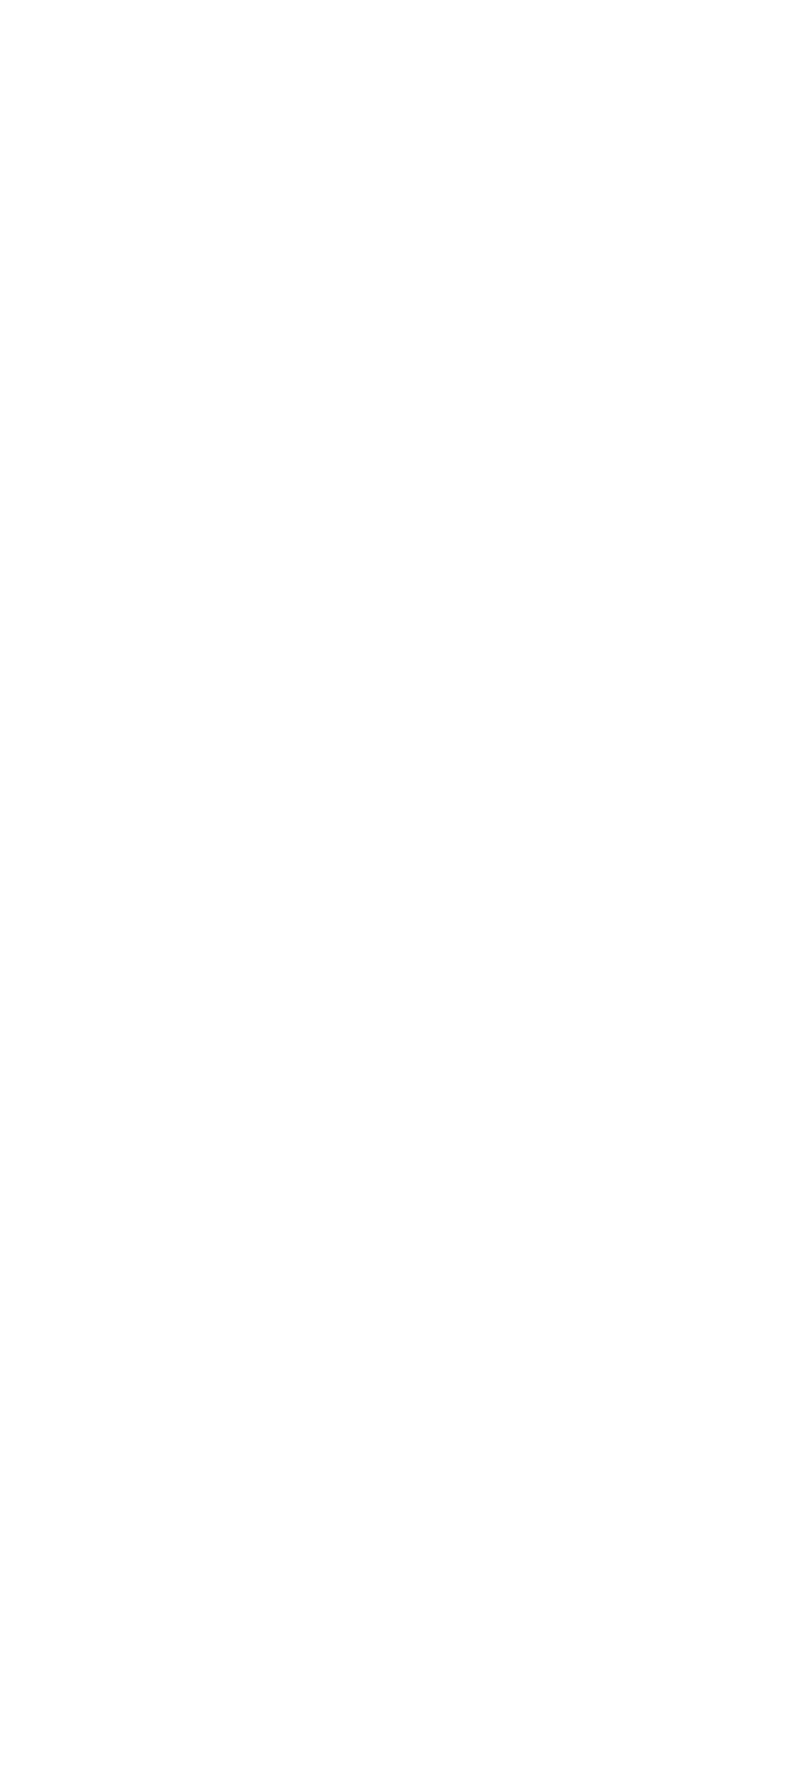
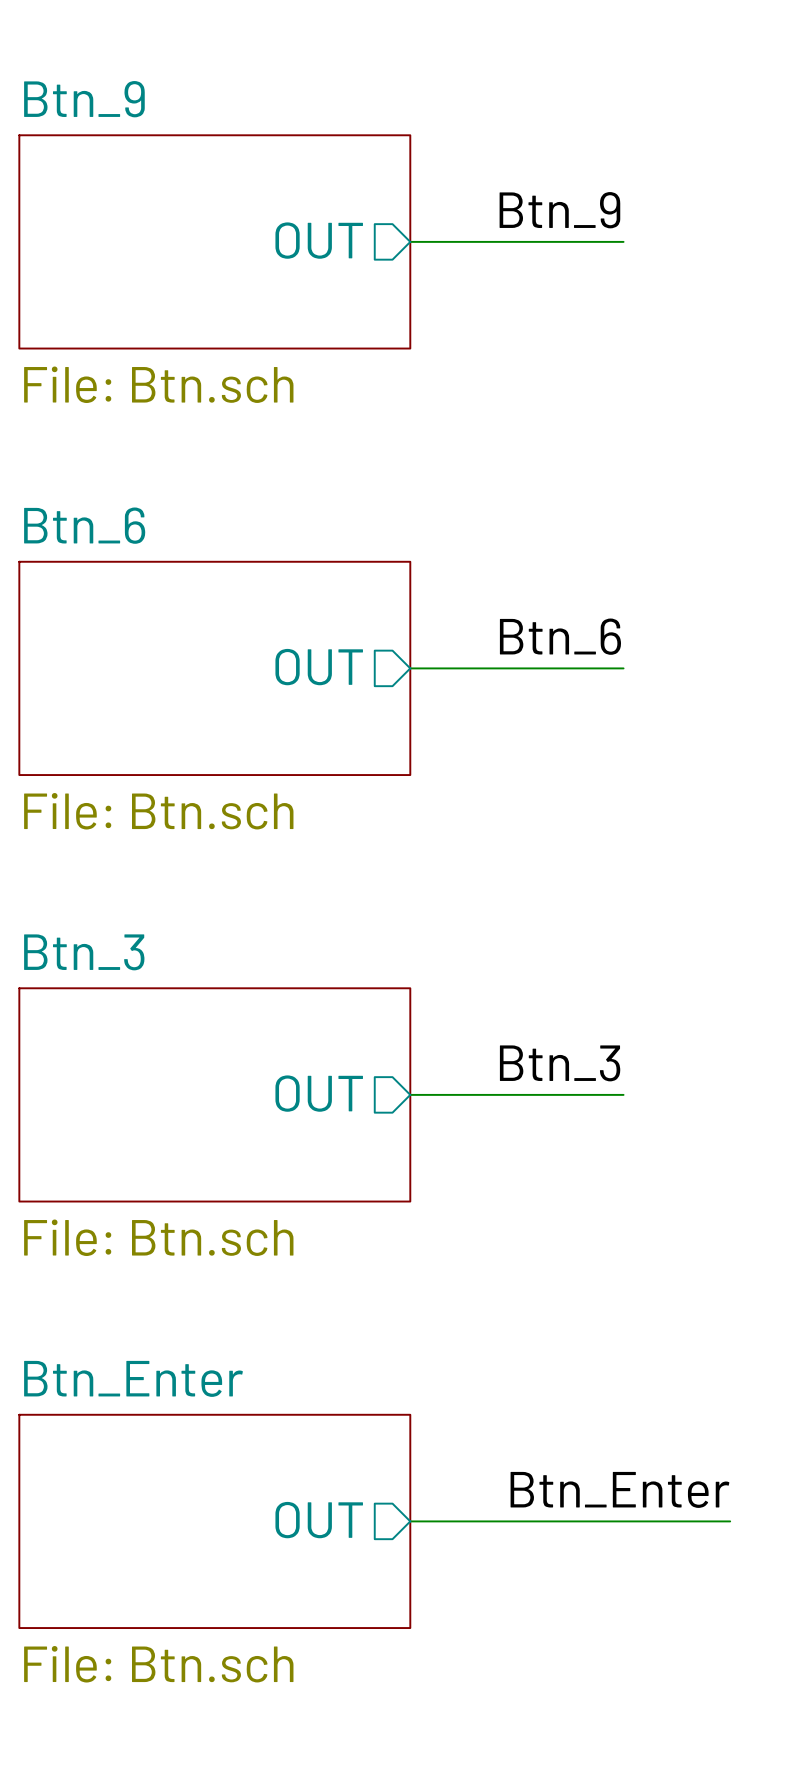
label: none -> Btn_9 (559, 210)
sheet pin: none -> OUT (319, 240)
sheet Btn_9: none -> File: Btn.sch (214, 241)
wire: none -> (410, 241) (623, 241)
label: none -> Btn_6 (560, 636)
sheet pin: none -> OUT (319, 667)
sheet Btn_6: none -> File: Btn.sch (214, 668)
wire: none -> (410, 668) (623, 668)
label: none -> Btn_3 (560, 1063)
sheet pin: none -> OUT (319, 1093)
sheet Btn_3: none -> File: Btn.sch (214, 1094)
wire: none -> (410, 1094) (623, 1094)
label: none -> Btn_Enter (619, 1489)
sheet pin: none -> OUT (319, 1520)
sheet Btn_Enter: none -> File: Btn.sch (214, 1521)
wire: none -> (410, 1521) (730, 1521)

